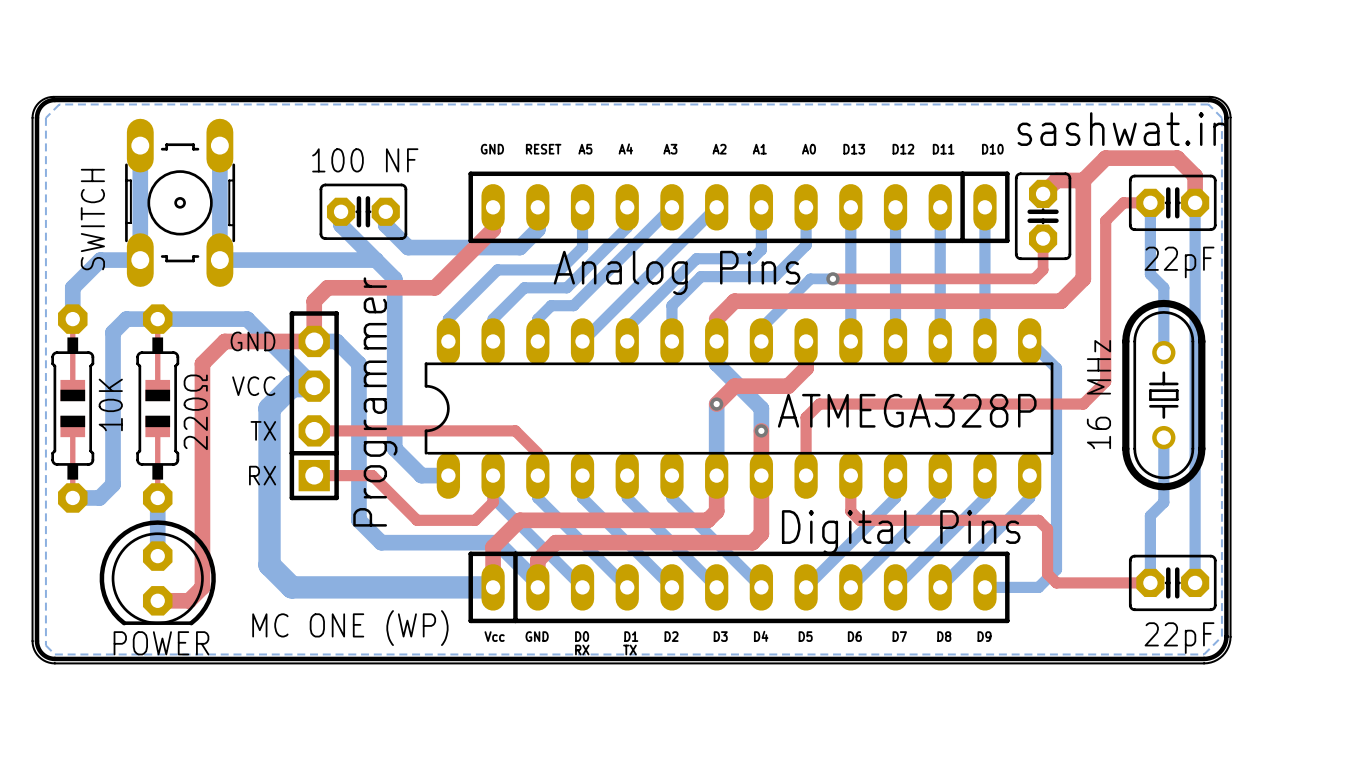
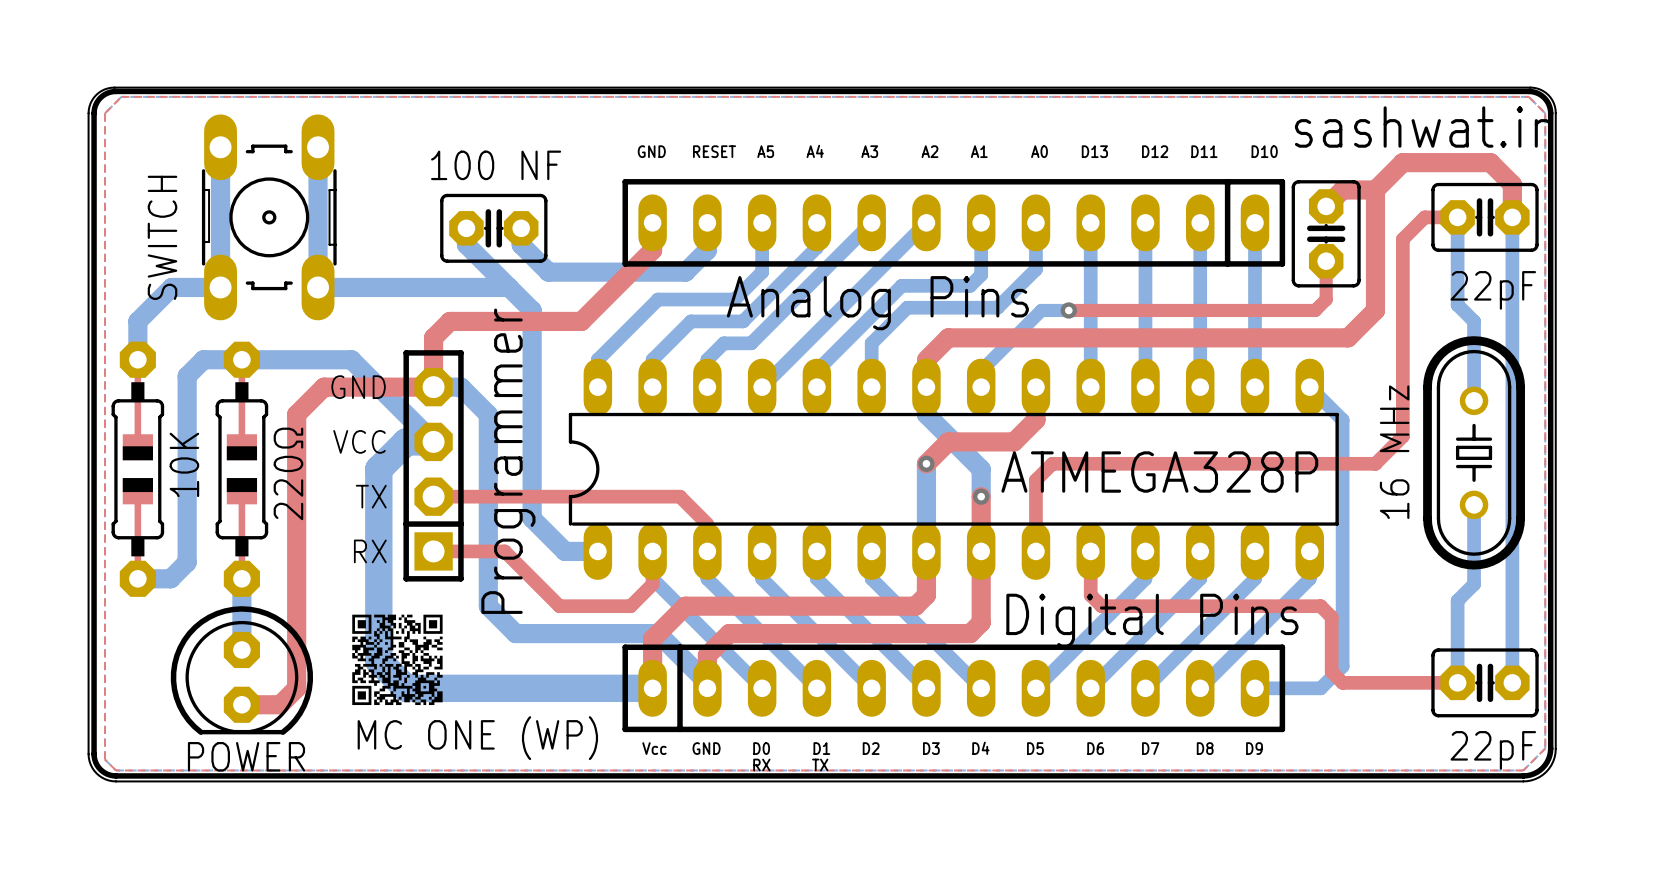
top zone outline: none -> (121, 96) (1528, 96) (1545, 113) (1545, 748) (1523, 770) (115, 770) (105, 759) (105, 113) (121, 96)
drawing: none -> [352, 614, 443, 706]

